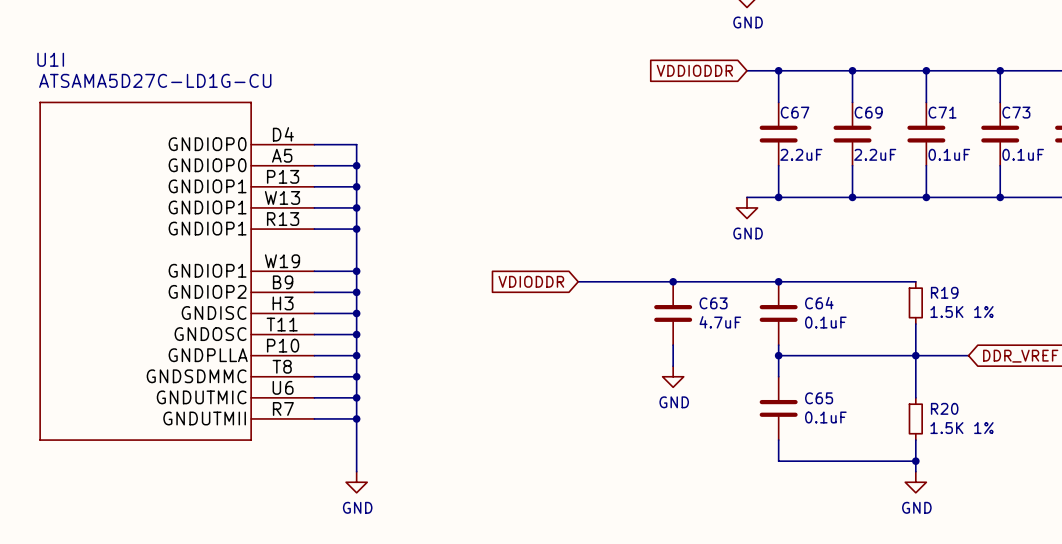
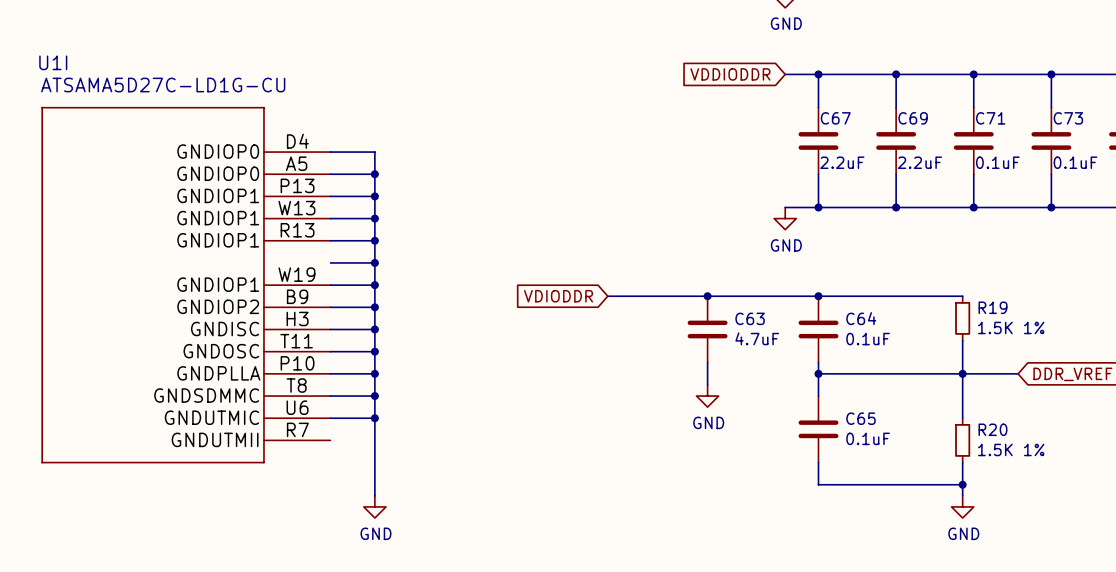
junction: none -> (374, 262)
wire: (314, 418) (356, 418) -> (330, 262) (374, 262)
junction: (356, 418) -> none

